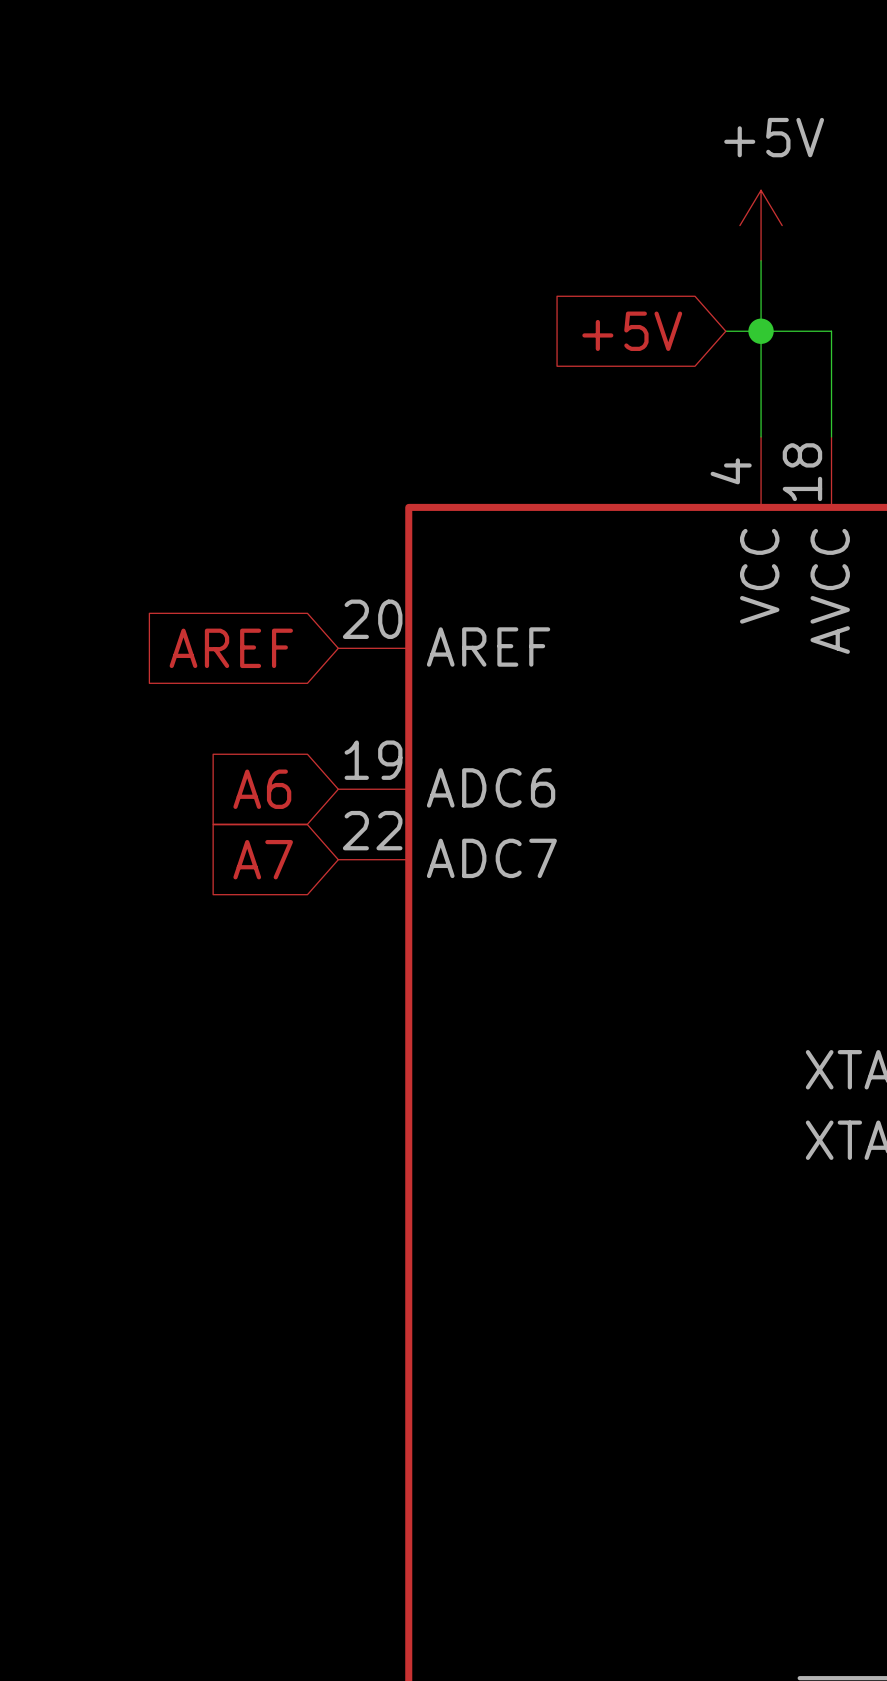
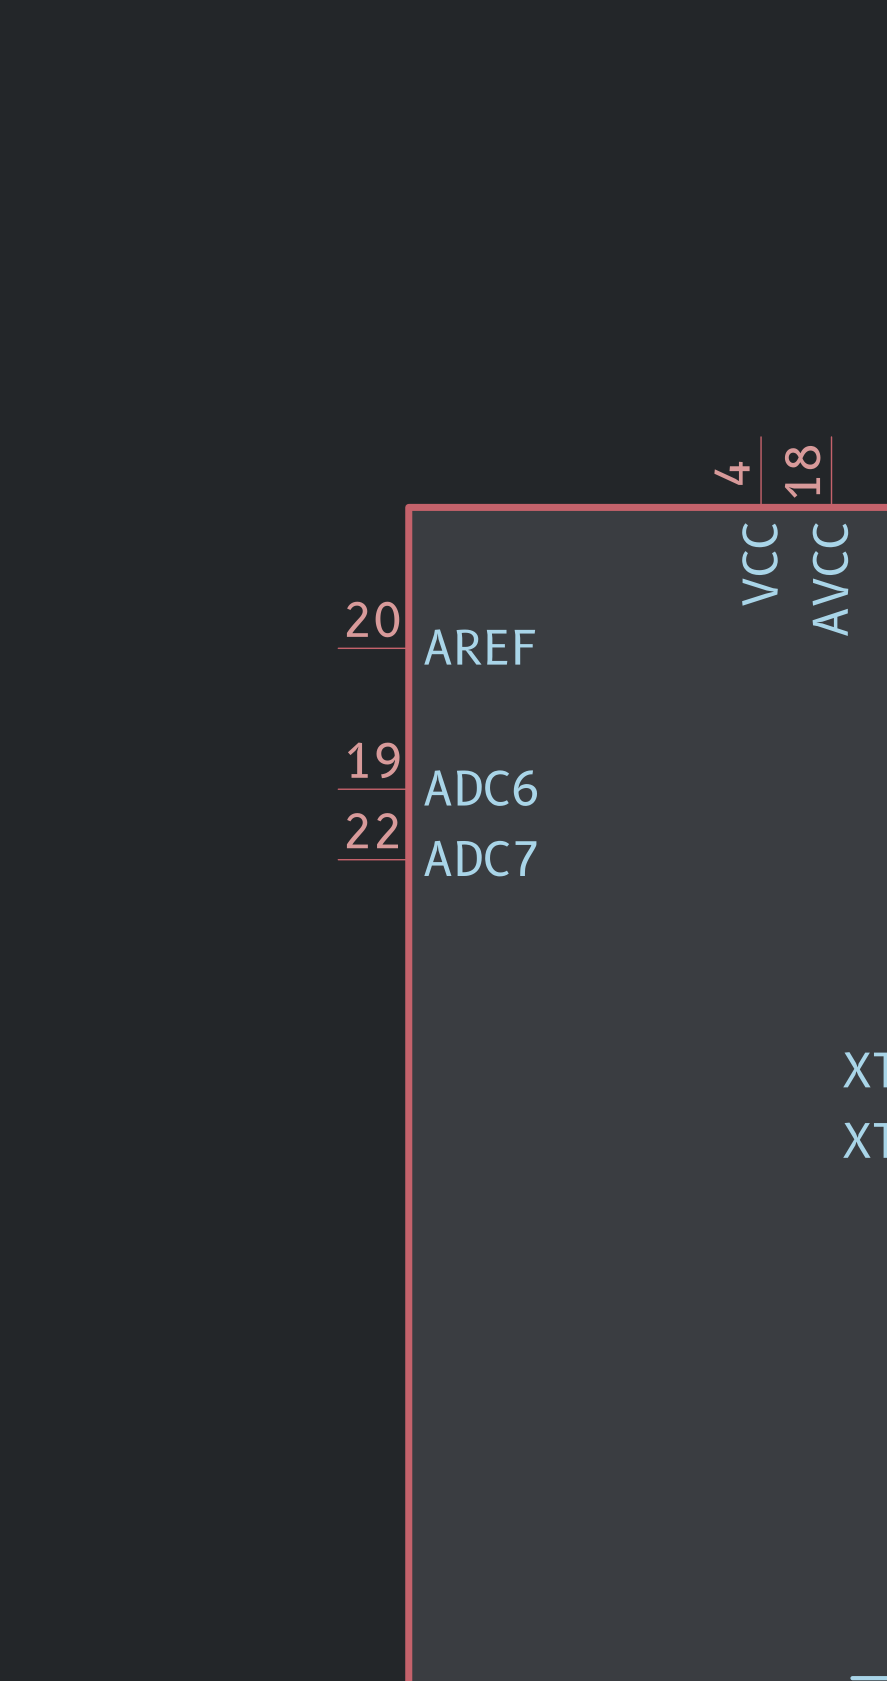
power symbol: +5V (761, 225) -> none
wire: (761, 260) (761, 436) -> none
global label: +5V (632, 331) -> none
wire: (725, 331) (831, 331) (831, 436) -> none
junction: (761, 331) -> none
global label: AREF (231, 648) -> none
global label: A6 (262, 789) -> none
global label: A7 (263, 859) -> none

